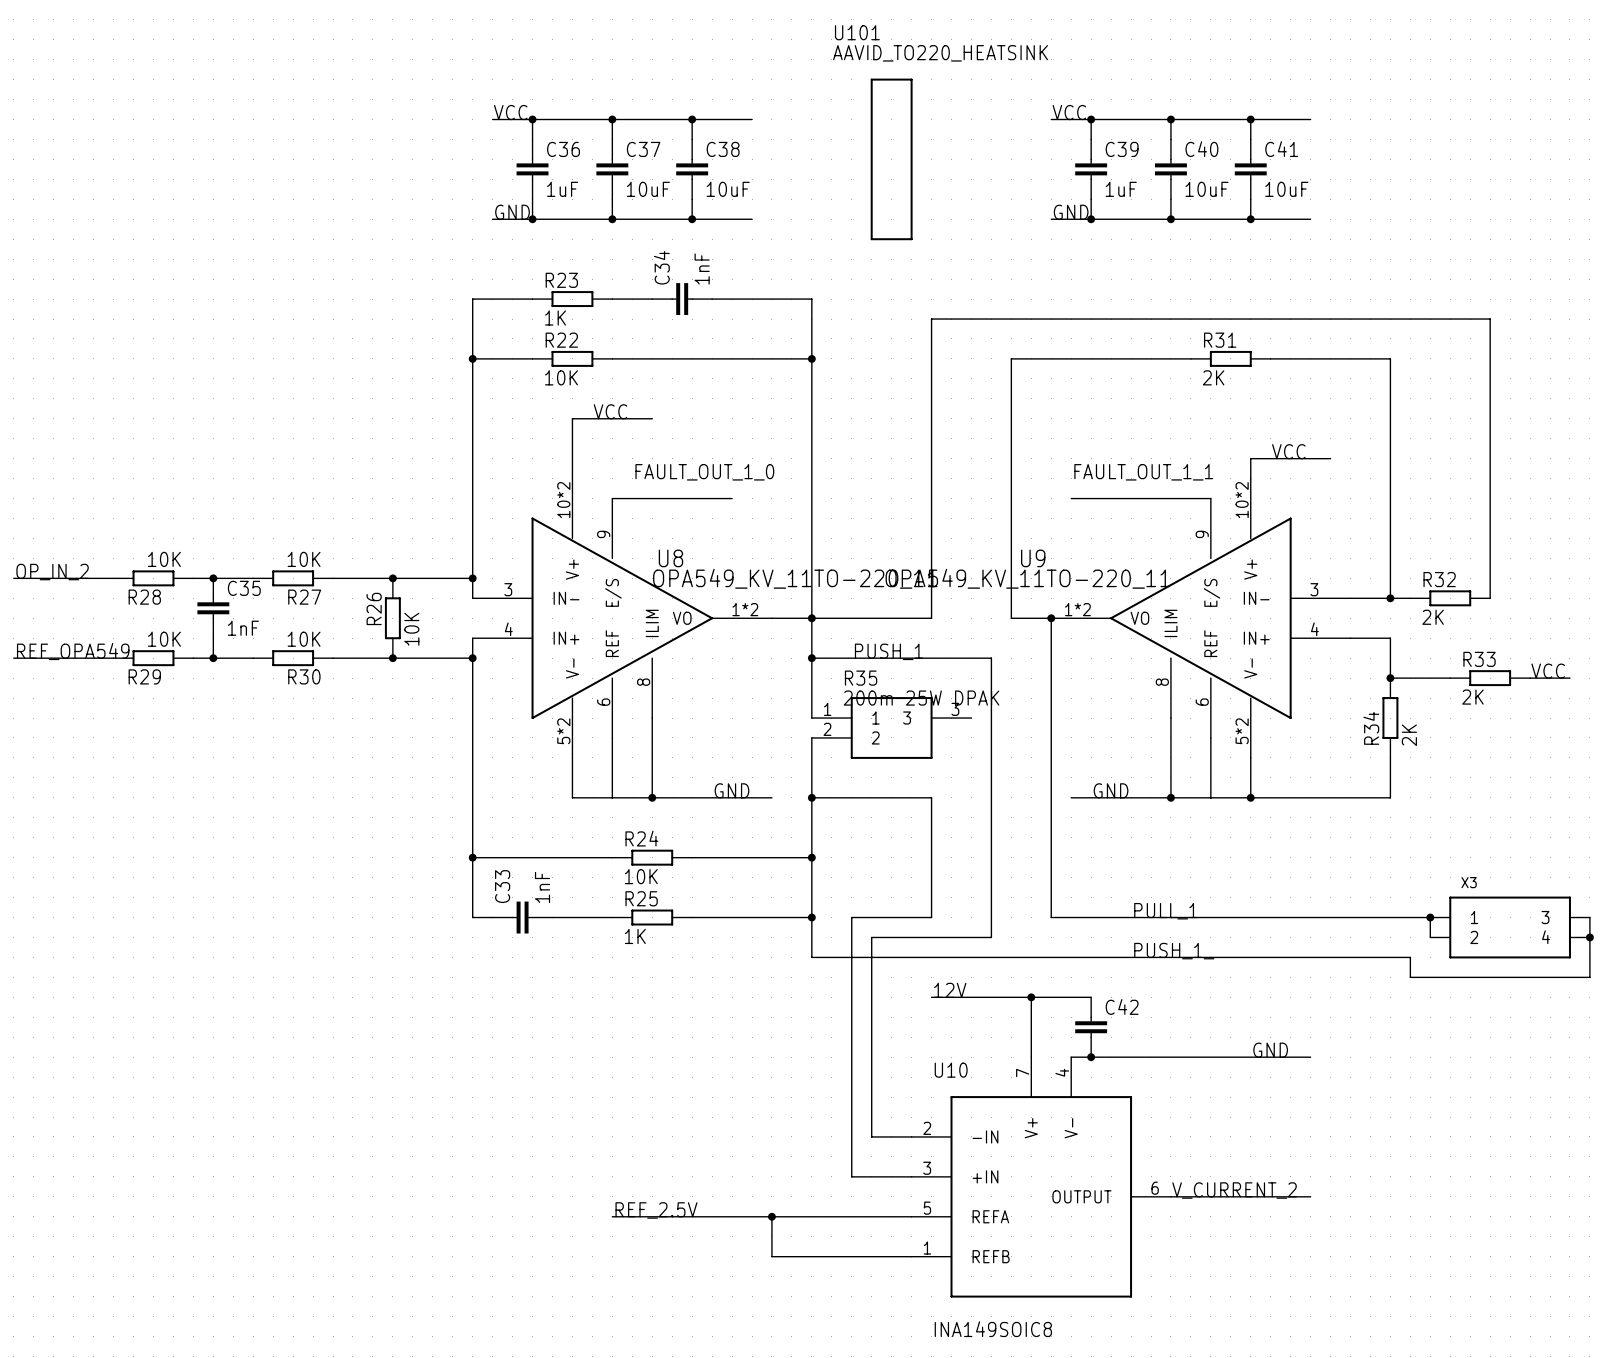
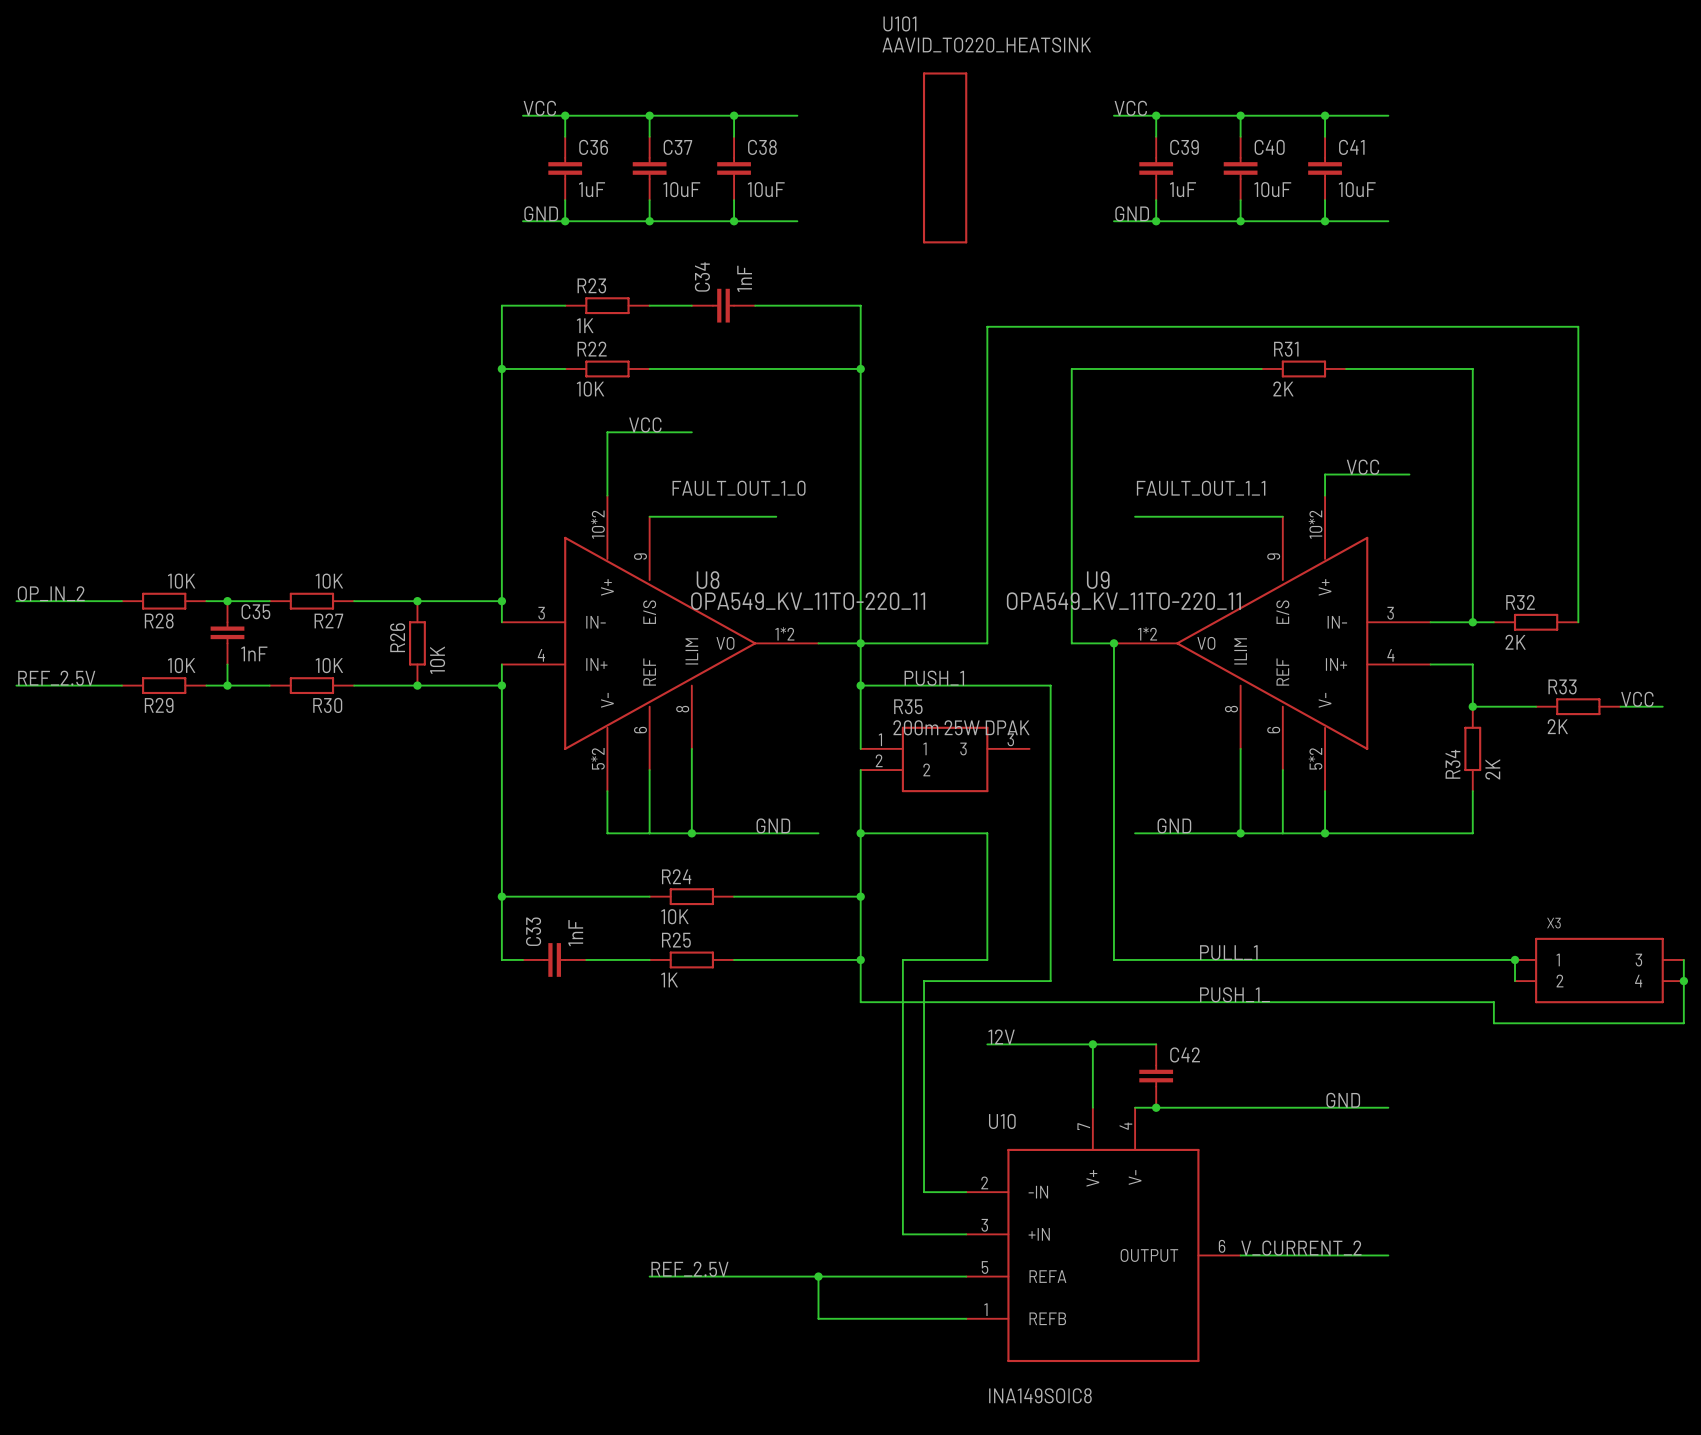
label: REF_OPA549 (73, 651) -> REF_2.5V (56, 678)

